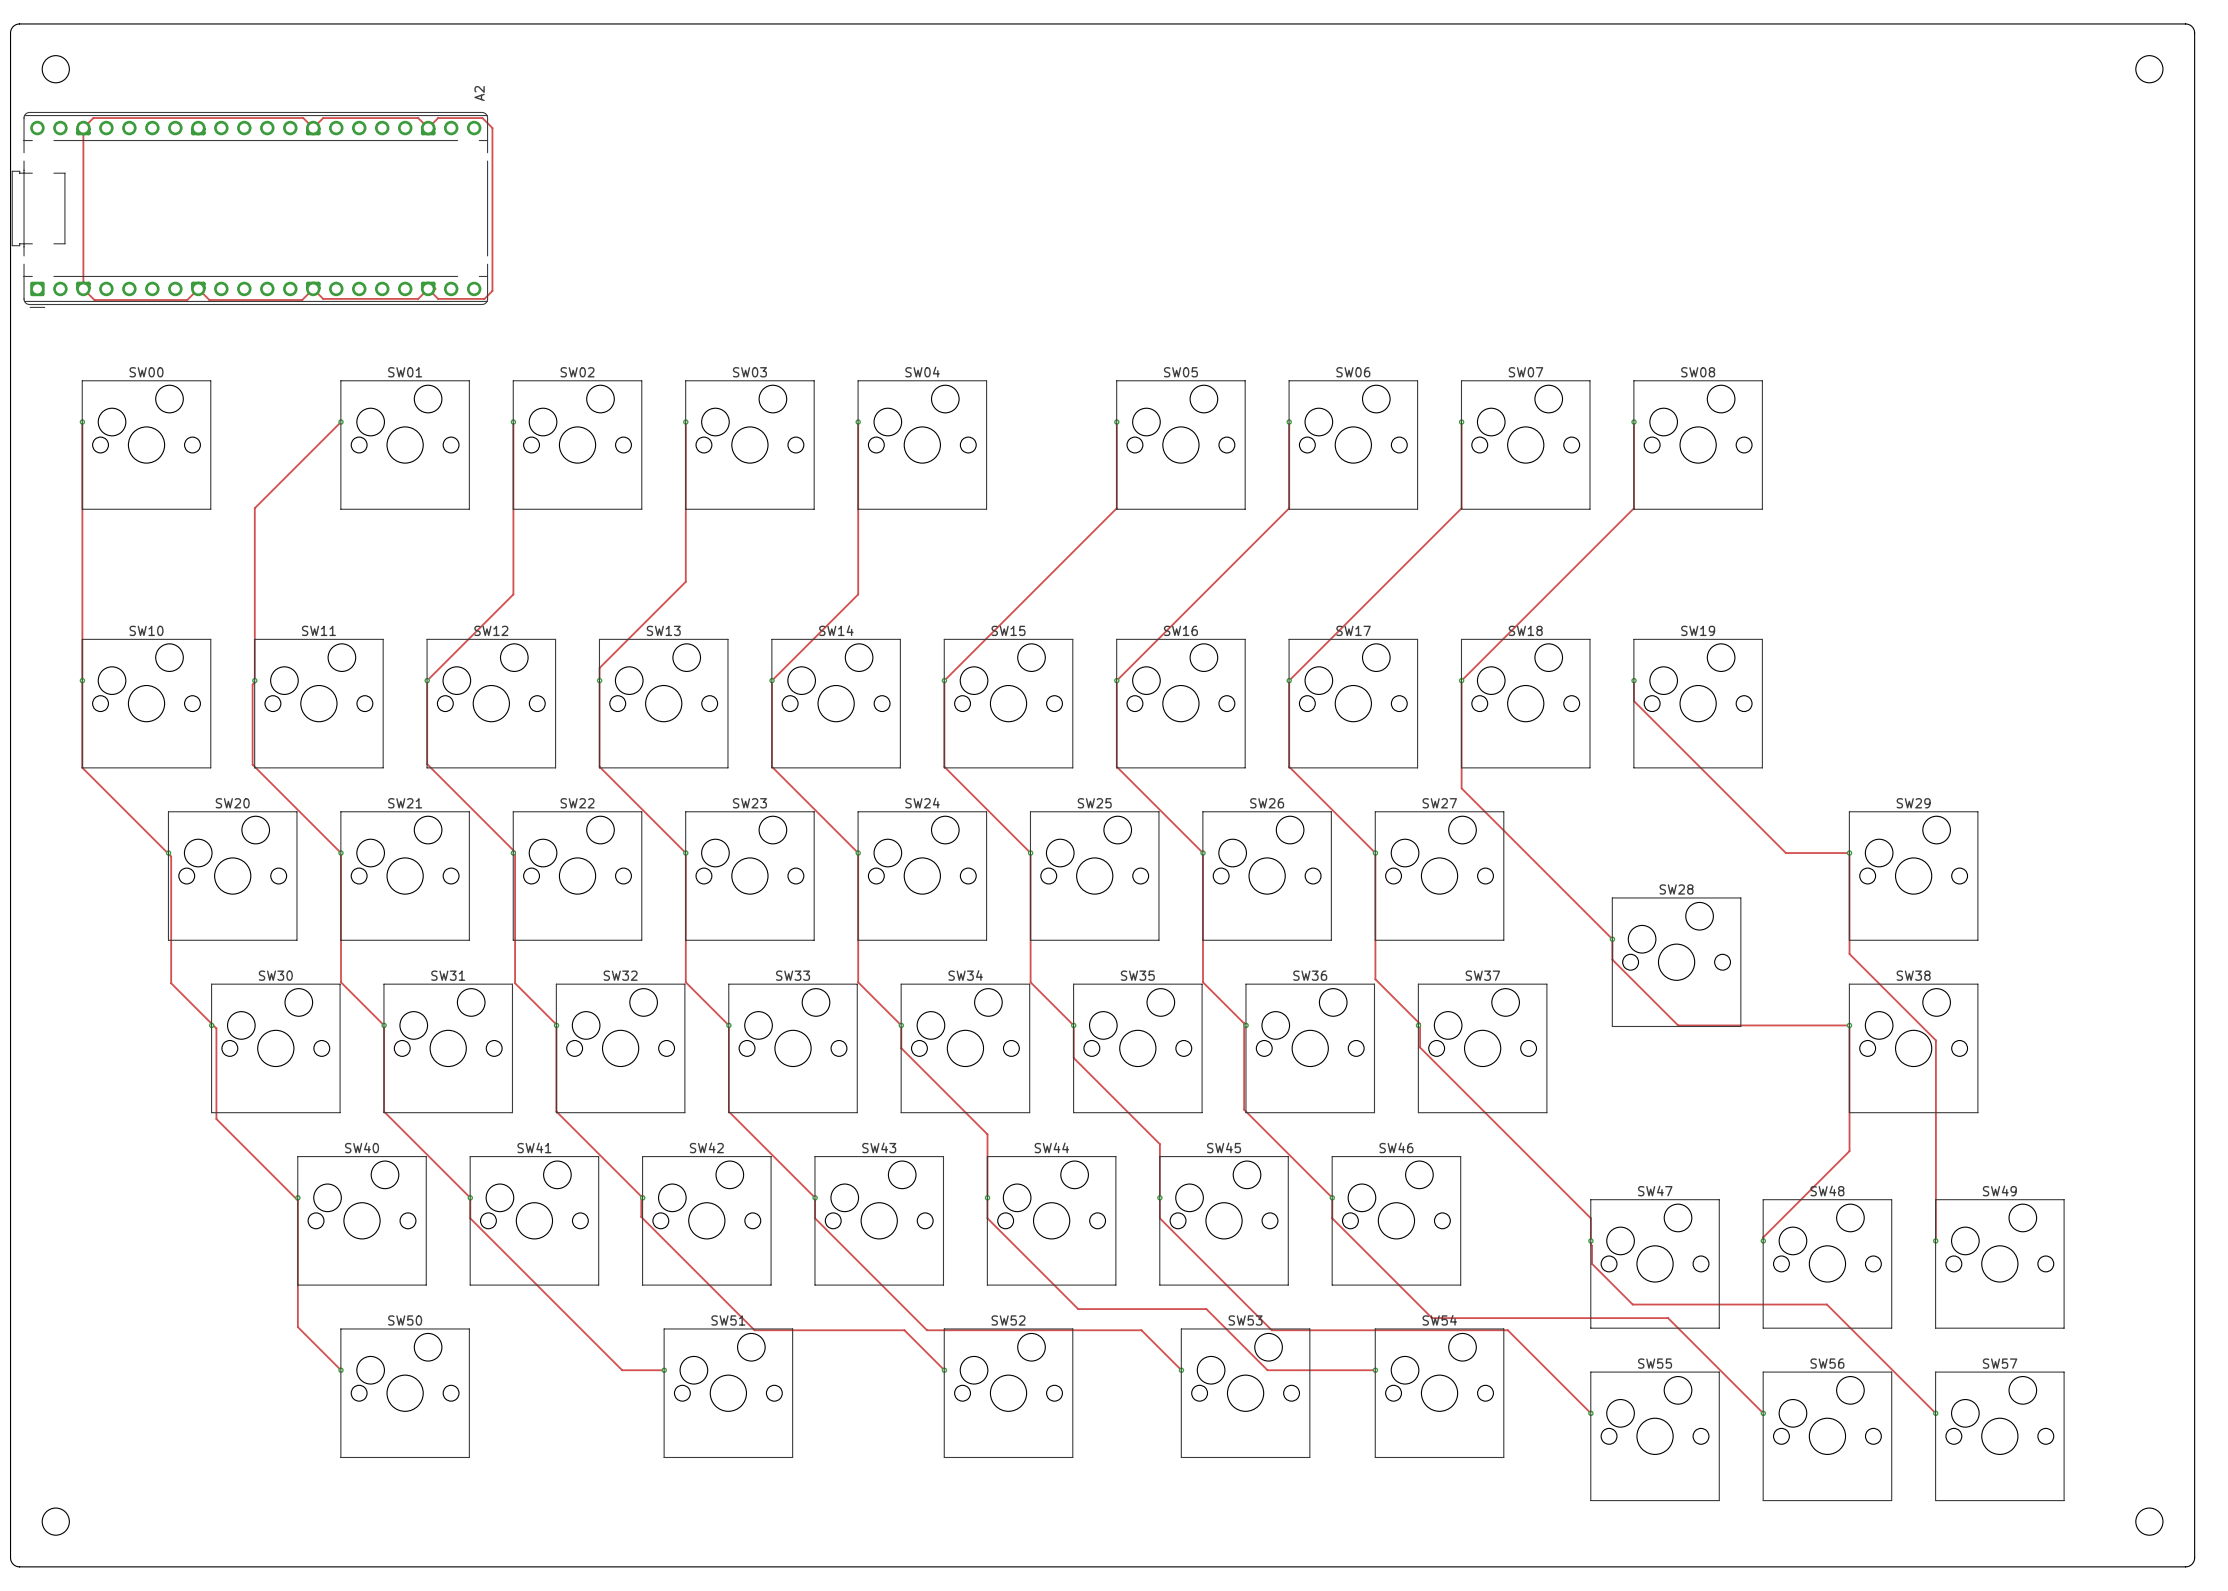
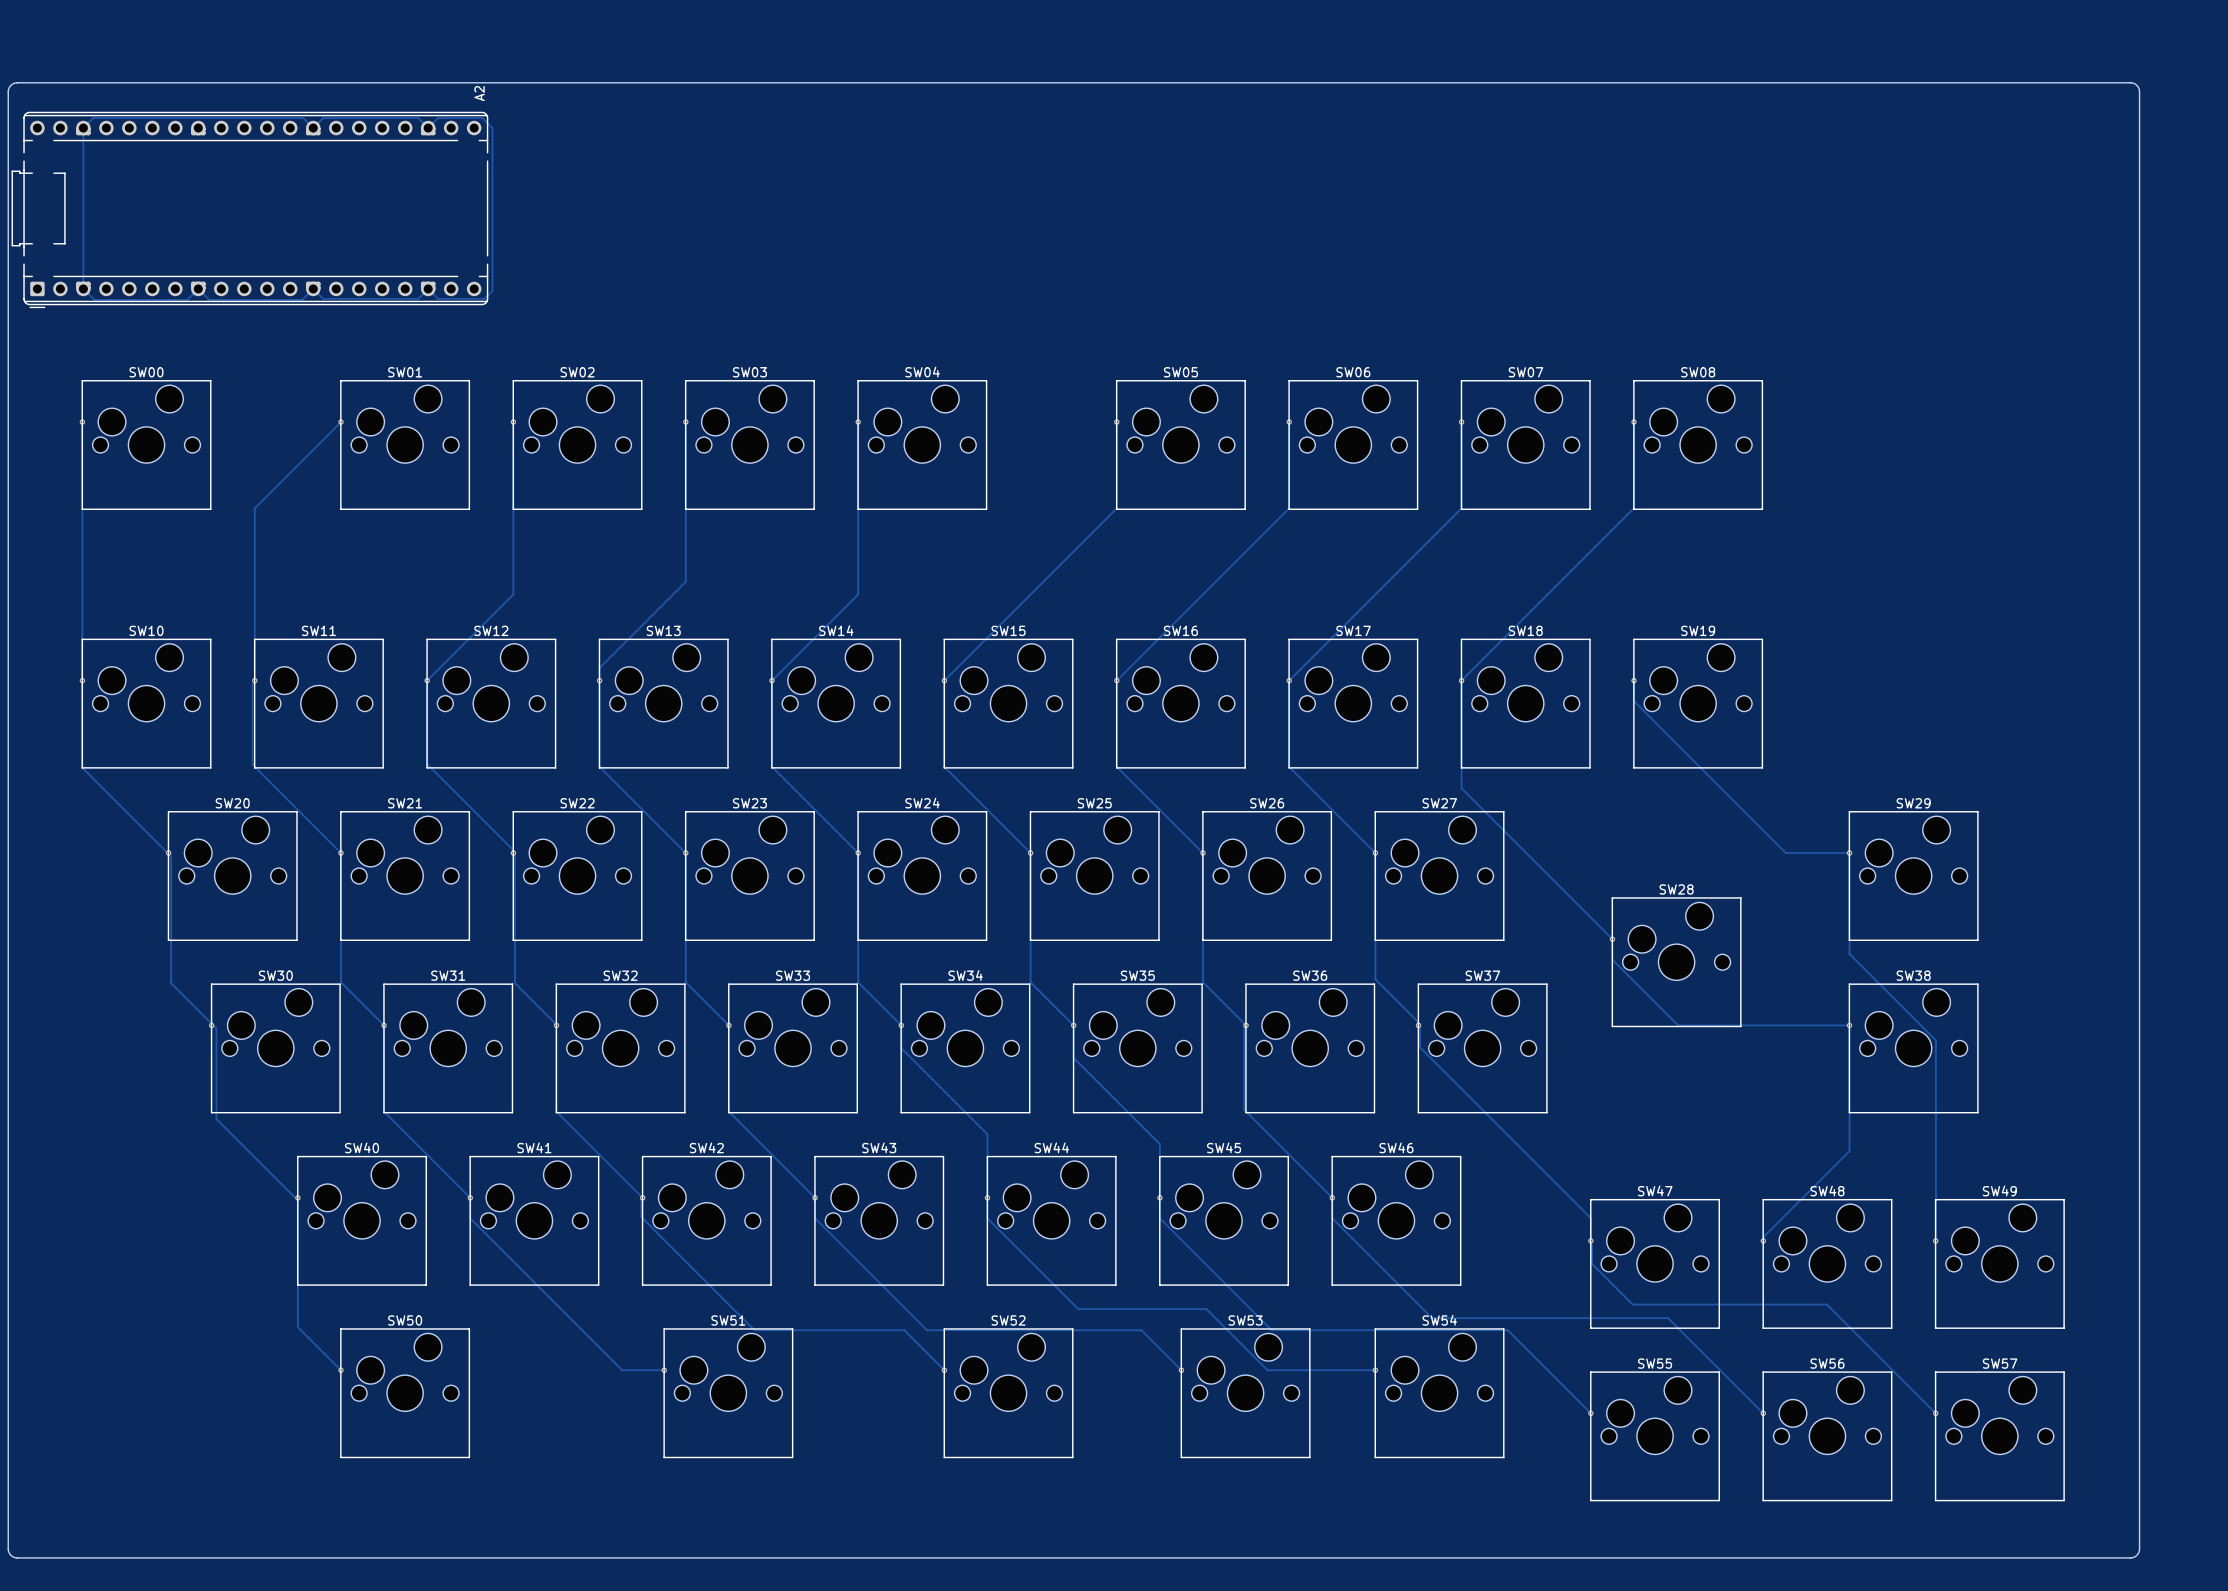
board edge: (19, 23) (2190, 25) (2194, 33) (2193, 1562) (2185, 1566) (14, 1565) (10, 1557) (10, 33) (13, 26) (19, 23) -> (17, 82) (10, 85) (8, 91) (8, 1548) (12, 1556) (2130, 1557) (2138, 1553) (2139, 91) (2135, 84) (17, 82)
round board edge: [41, 55, 70, 84] -> none
round board edge: [2135, 55, 2164, 84] -> none
round board edge: [41, 1507, 70, 1536] -> none
round board edge: [2135, 1507, 2164, 1536] -> none

